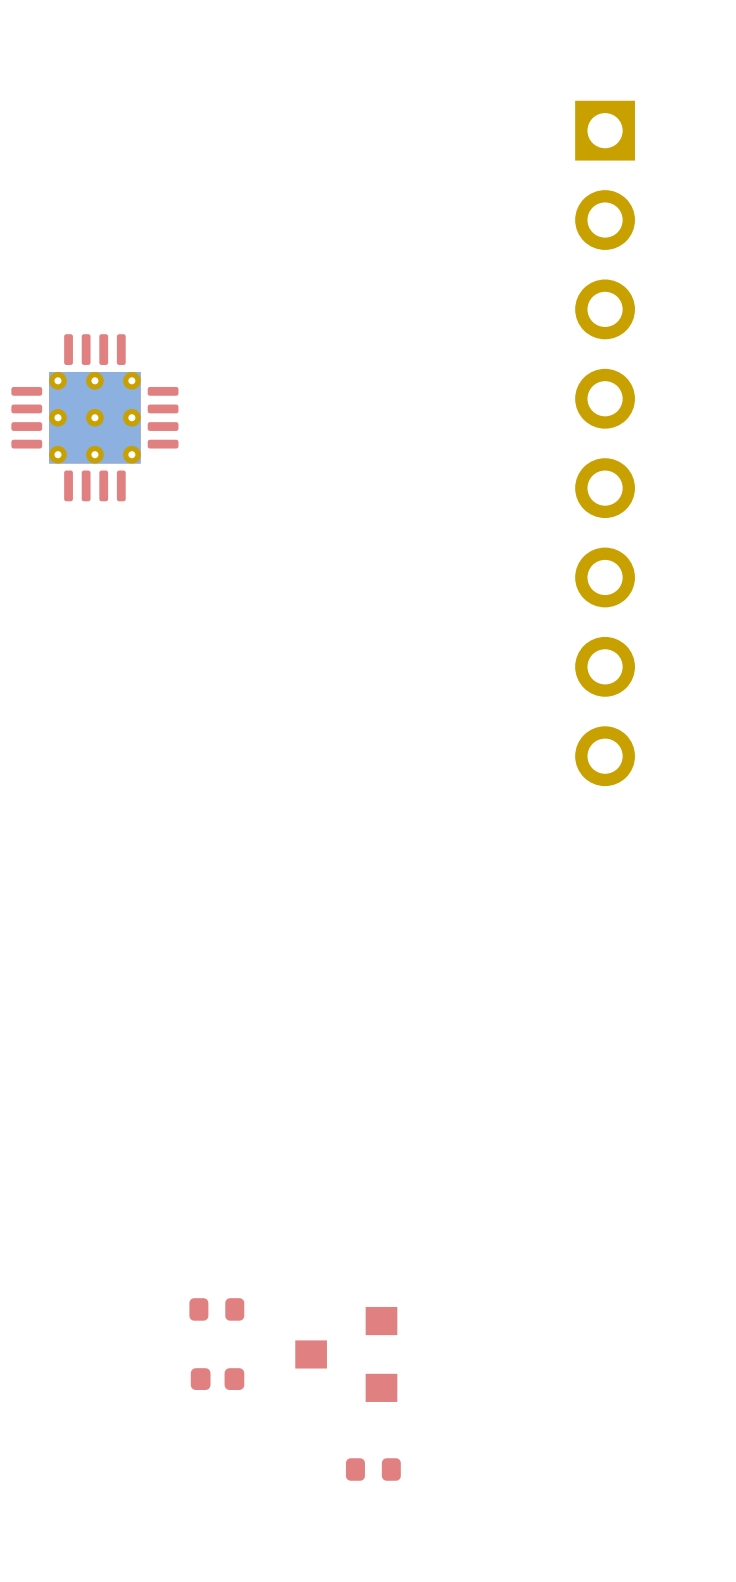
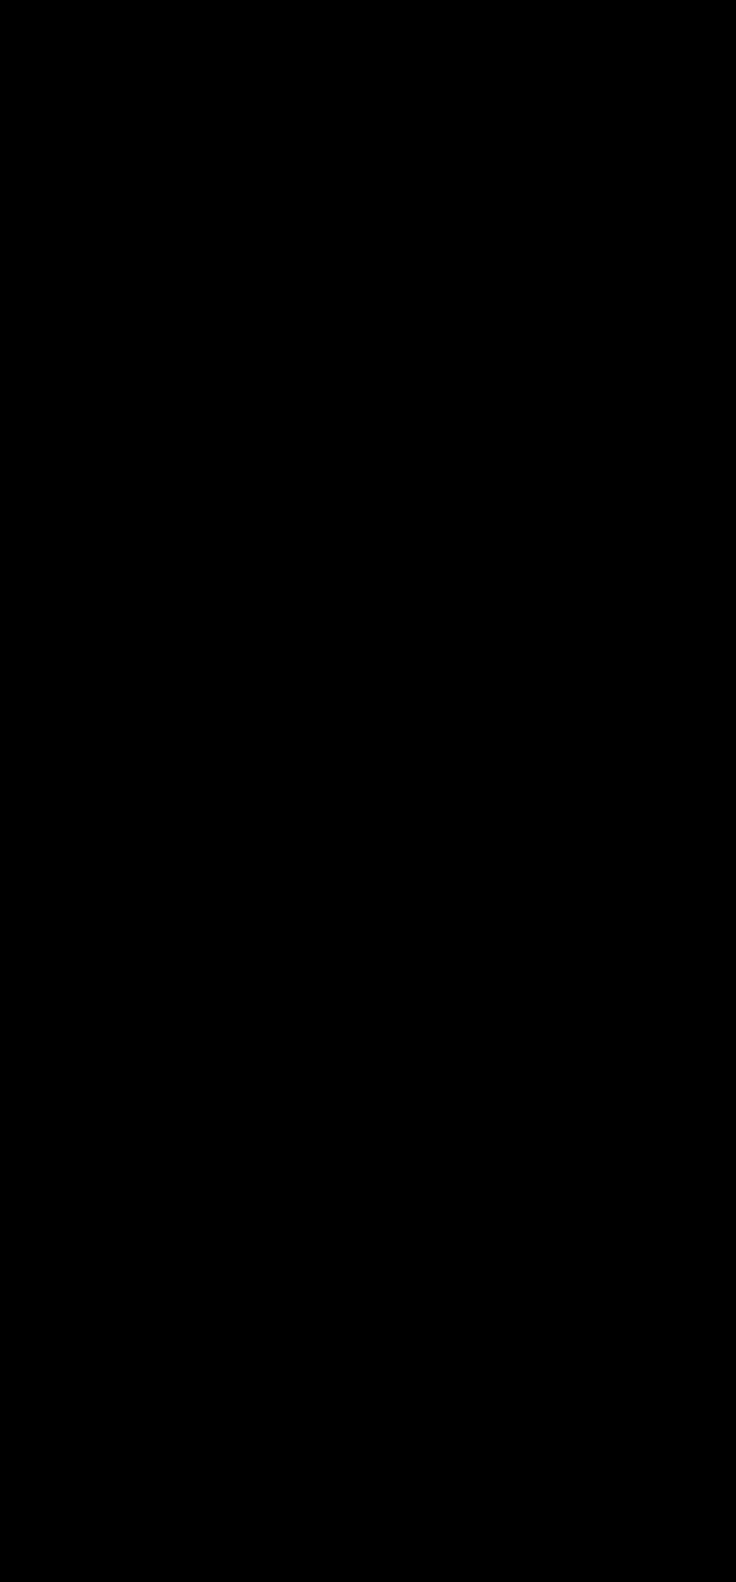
part: (94, 417) -> none
part: (605, 443) -> none
part: (216, 1309) -> none
part: (346, 1354) -> none
part: (217, 1379) -> none
part: (373, 1469) -> none

